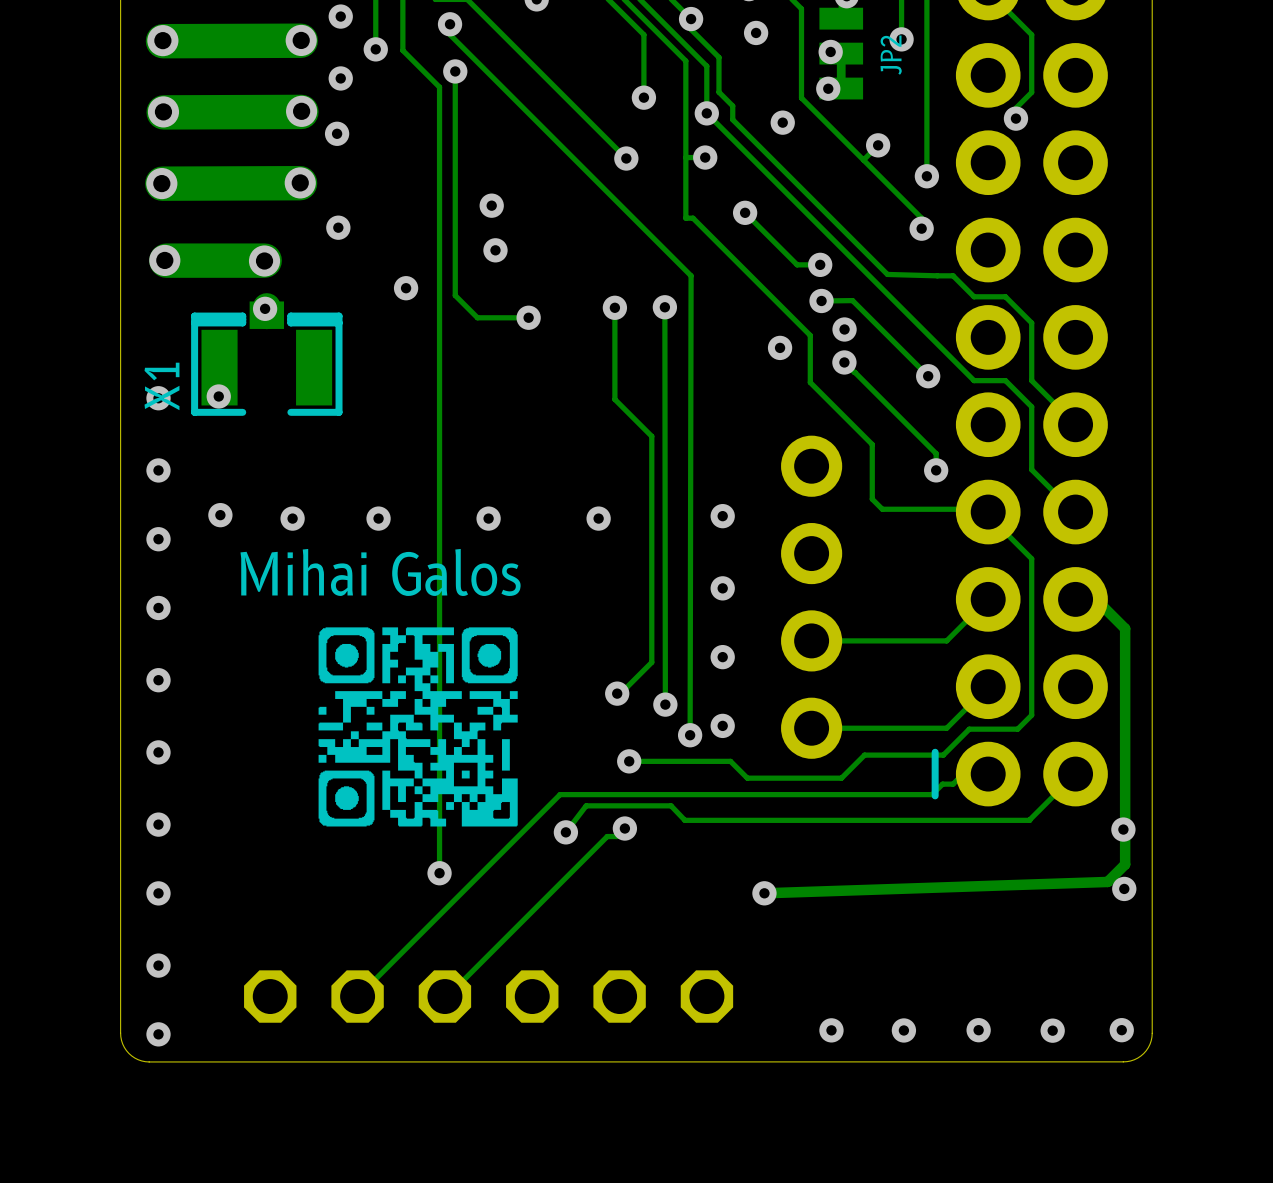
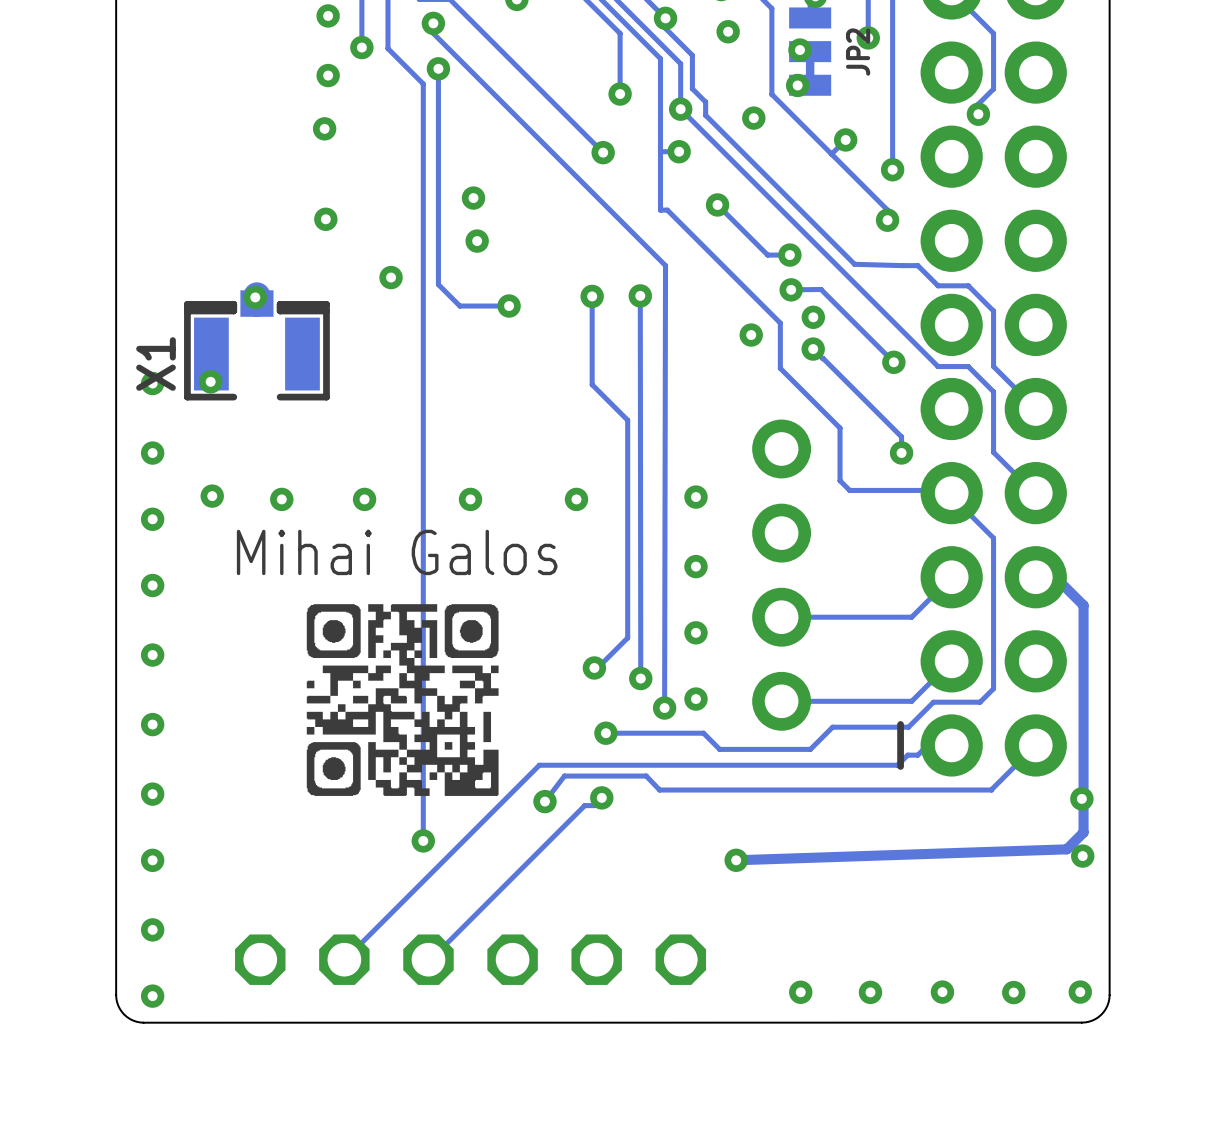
via: (162, 40) -> none
track: (300, 40) (162, 41) -> none
via: (301, 40) -> none
via: (163, 111) -> none
track: (301, 111) (163, 112) -> none
via: (301, 111) -> none
via: (300, 182) -> none
via: (161, 183) -> none
track: (300, 183) (162, 183) -> none
via: (164, 260) -> none
track: (264, 260) (166, 260) -> none
via: (264, 261) -> none

